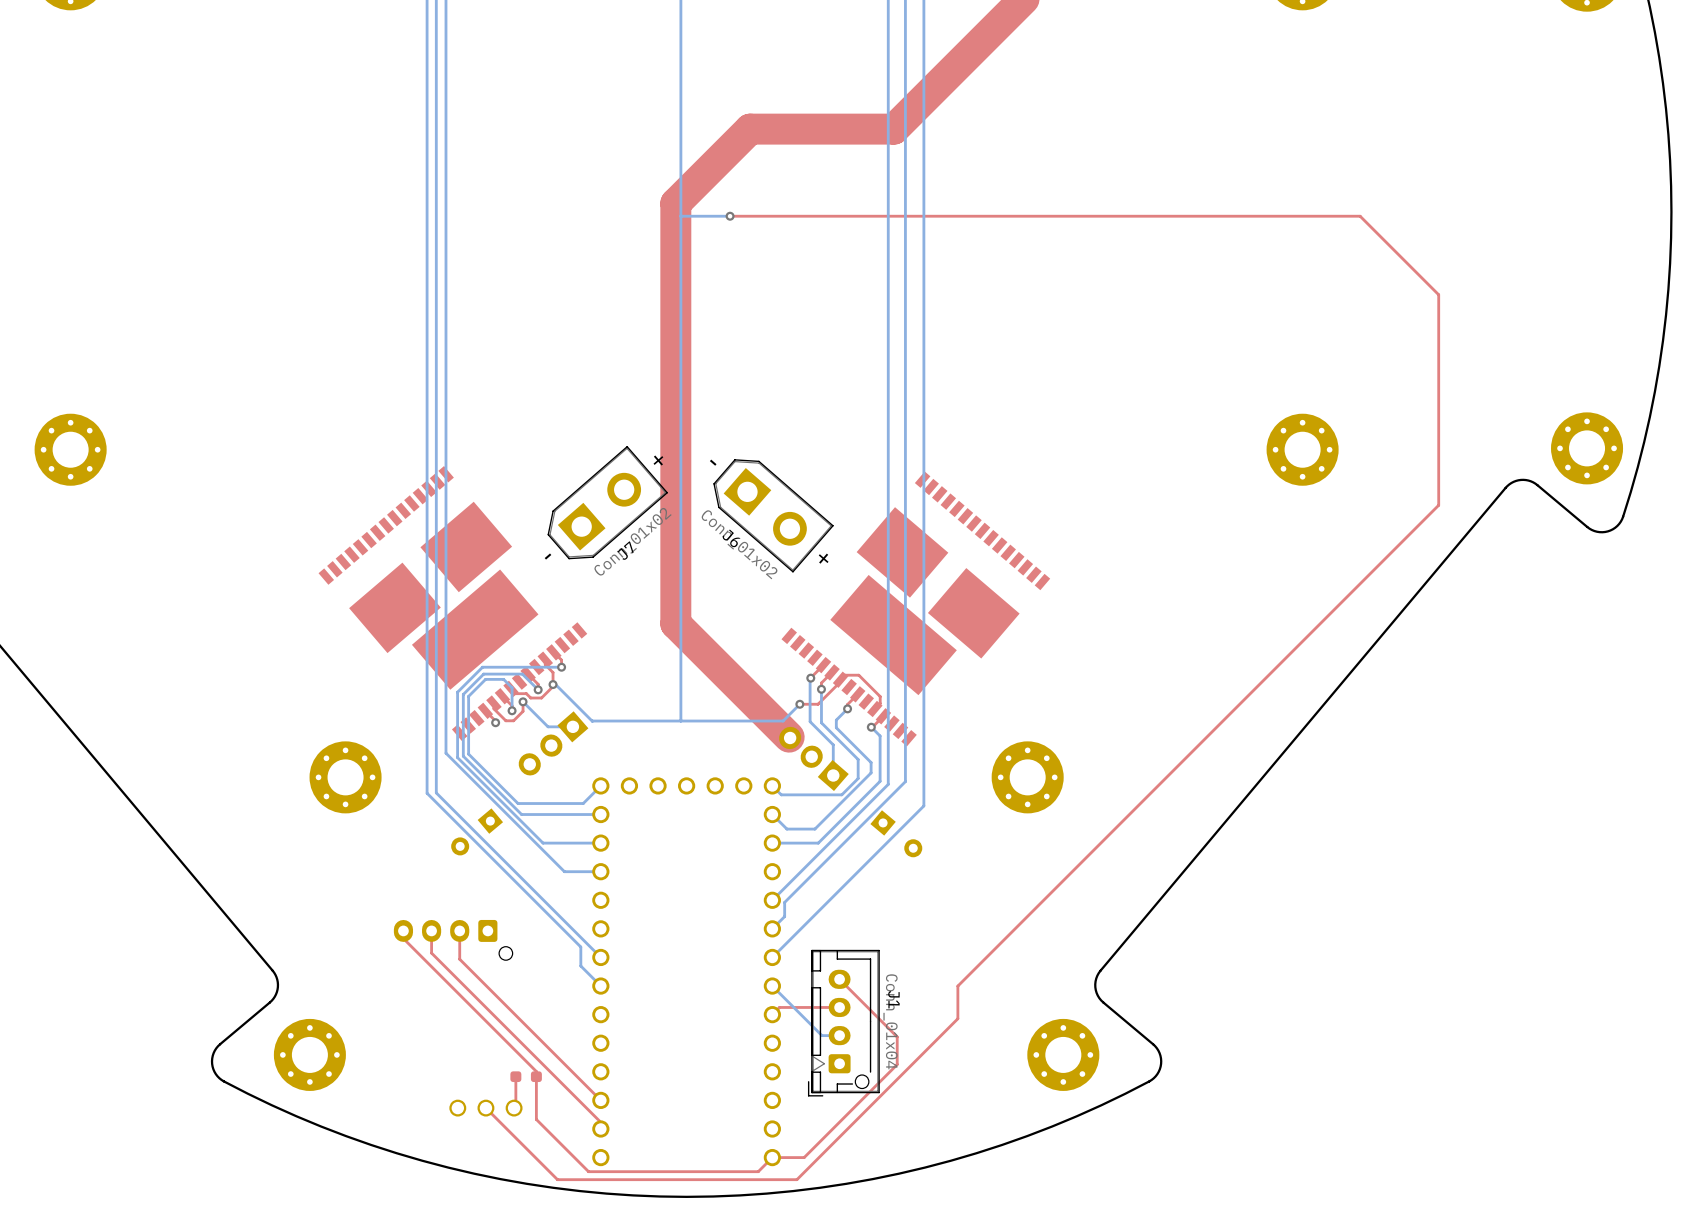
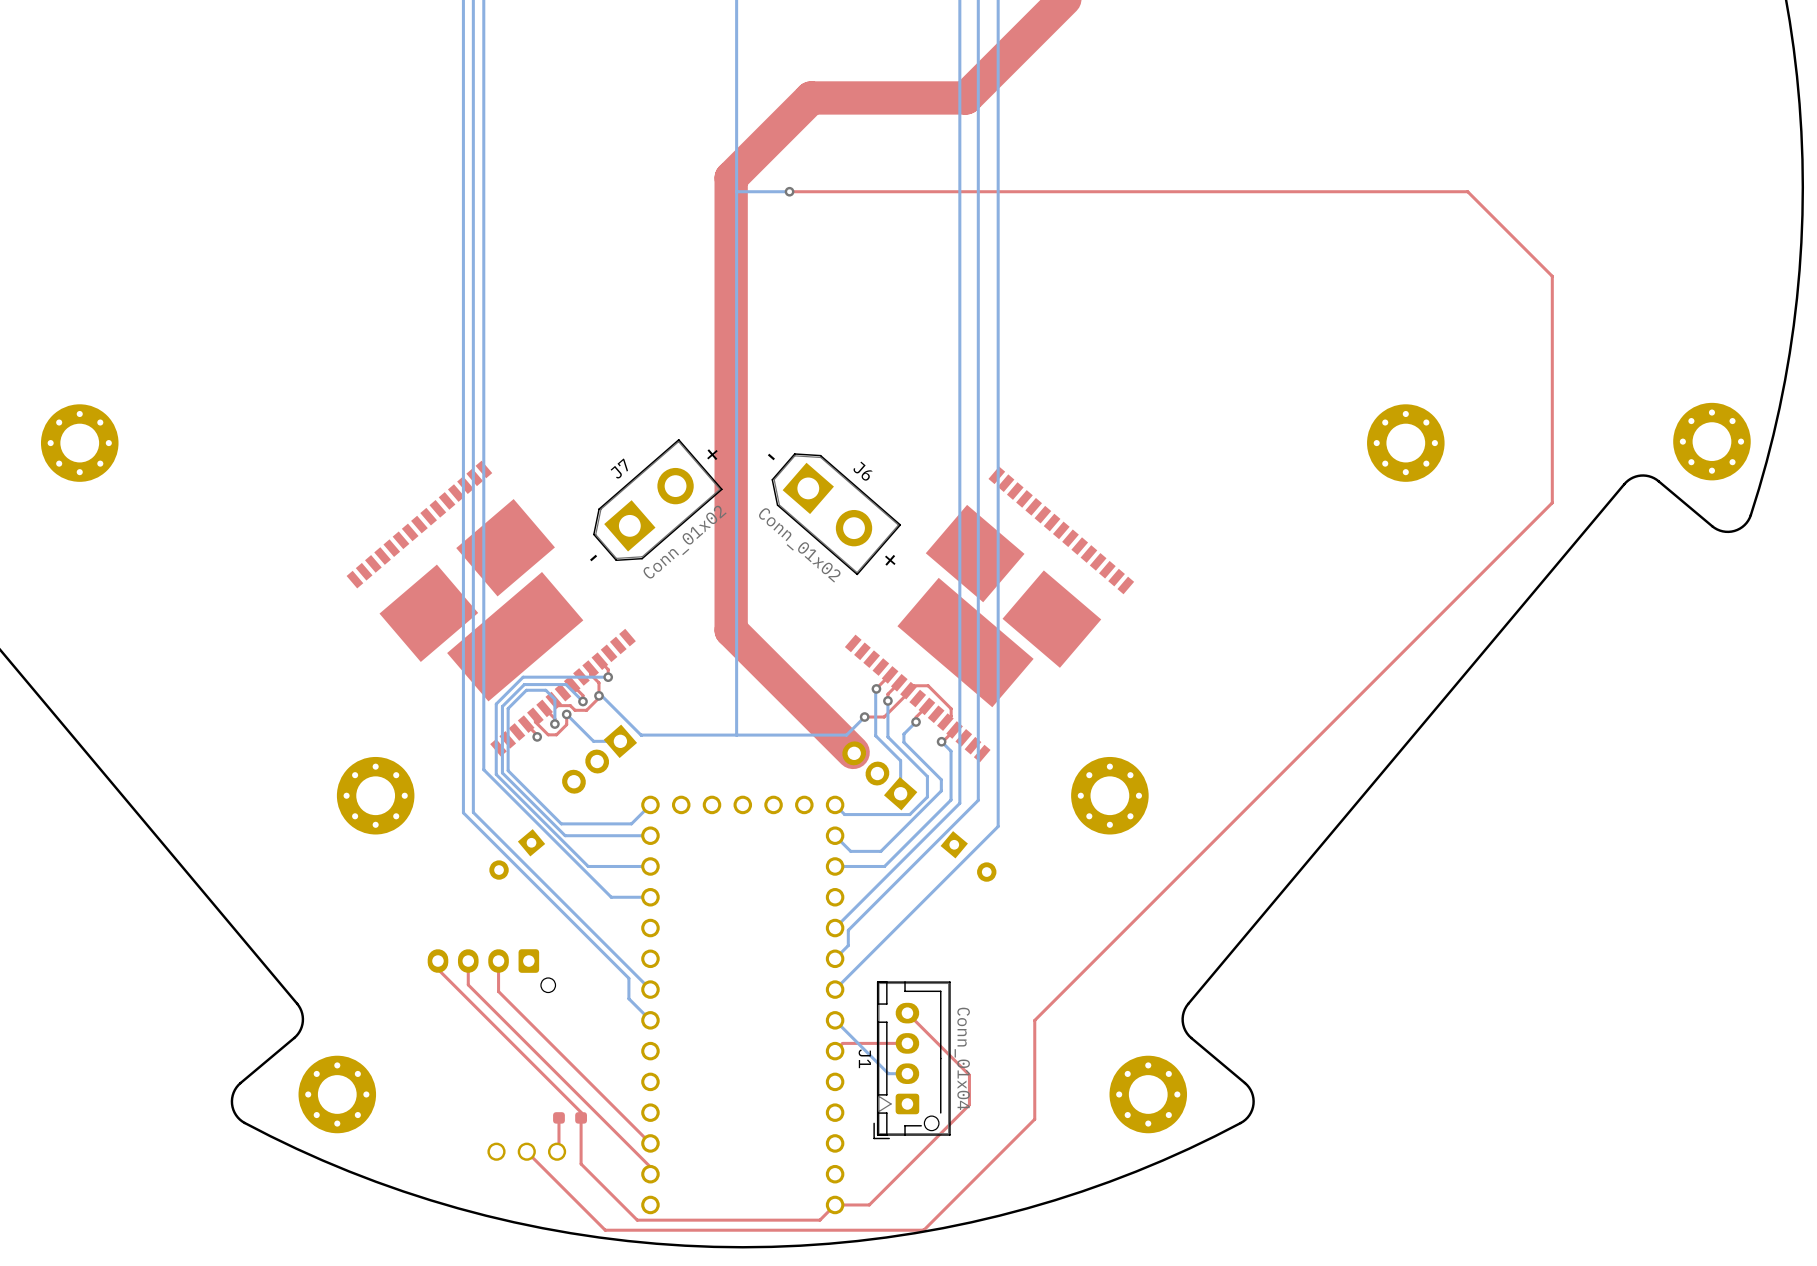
J6 name position: J6 (731, 538) -> J6 (863, 471)
J7 name position: J7 (625, 550) -> J7 (619, 468)
J1 name position: J1 (893, 999) -> J1 (864, 1058)
top track: (957, 1018) (796, 1179) (557, 1179) -> (1034, 1055) (1034, 1119) (923, 1230) (603, 1228)

